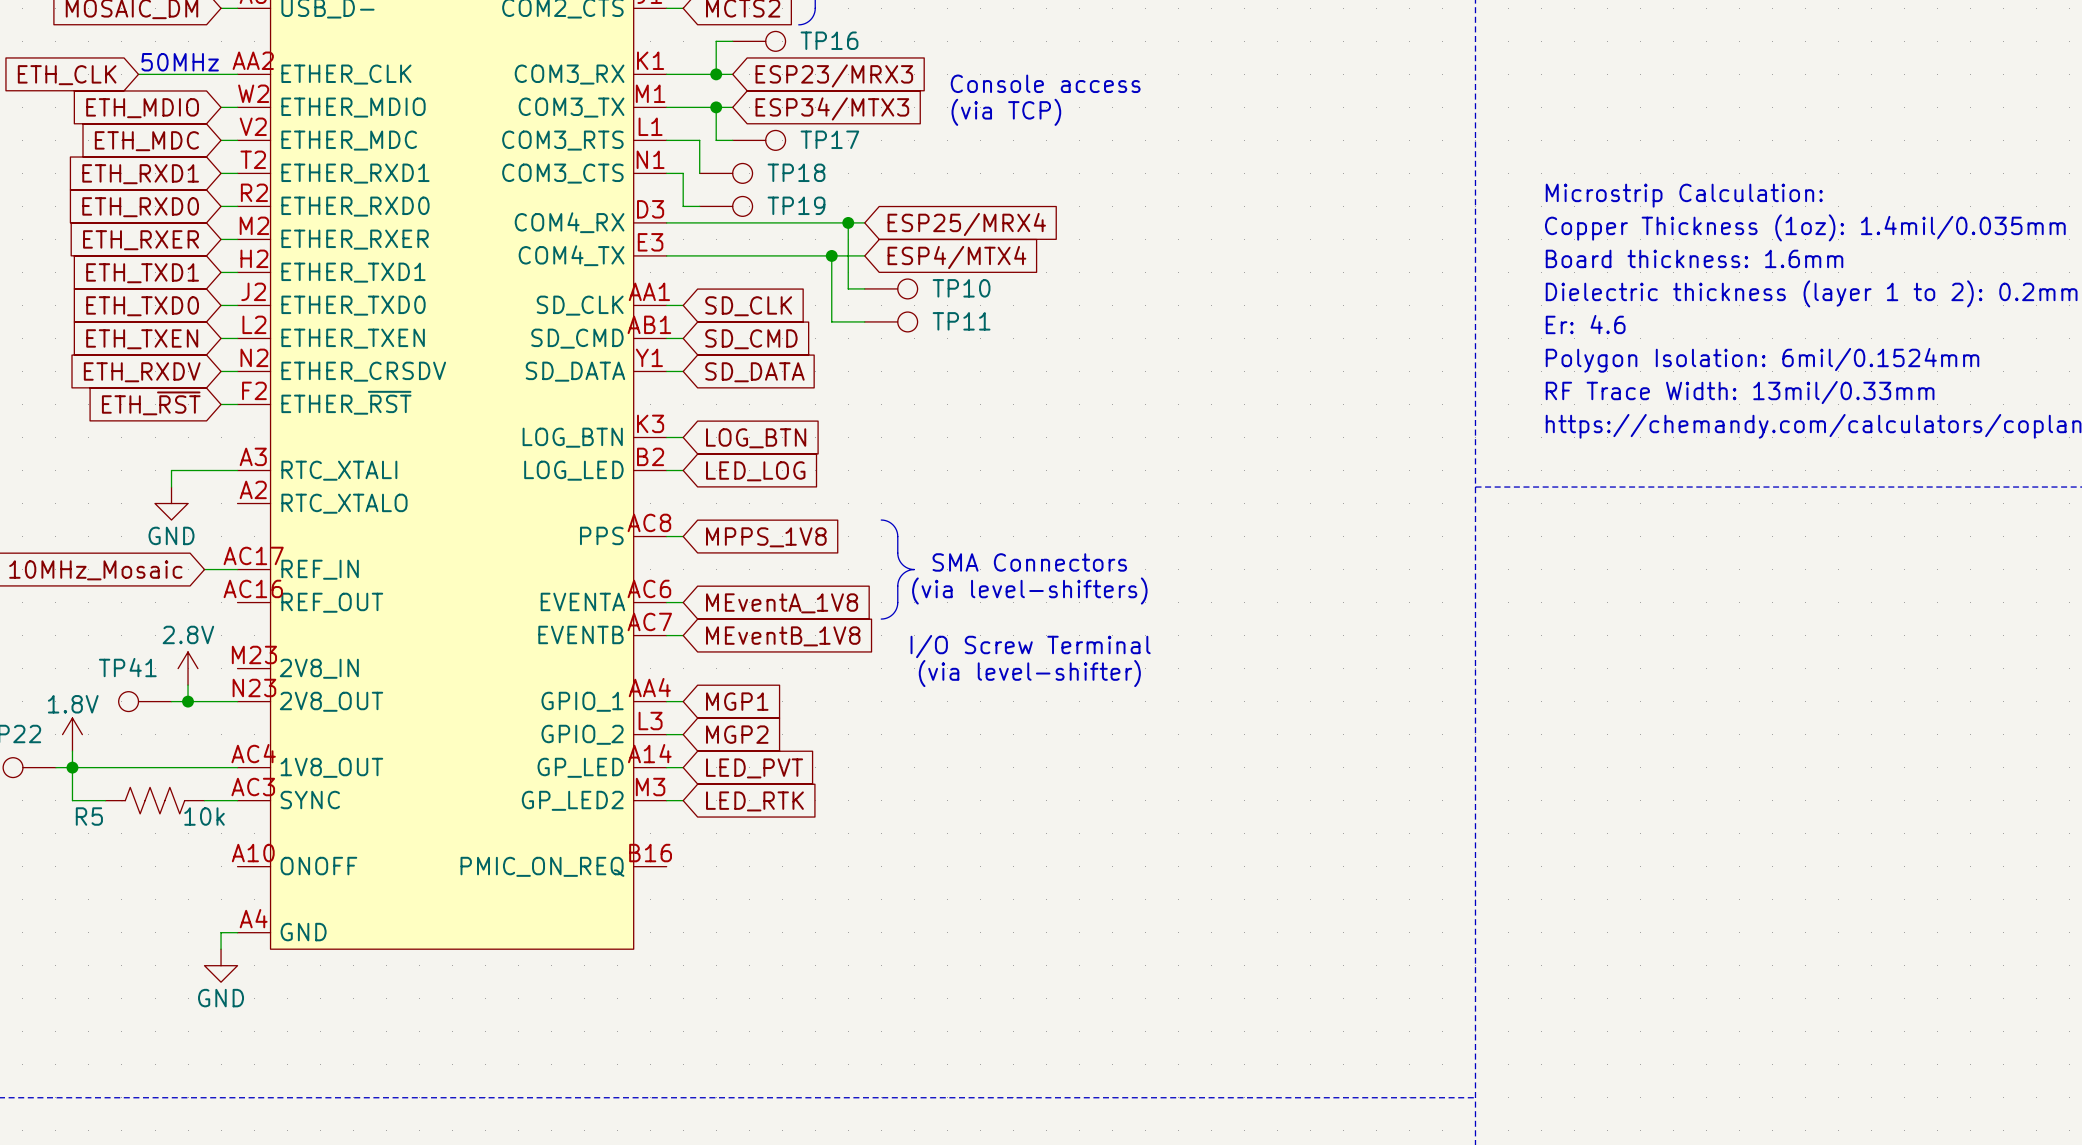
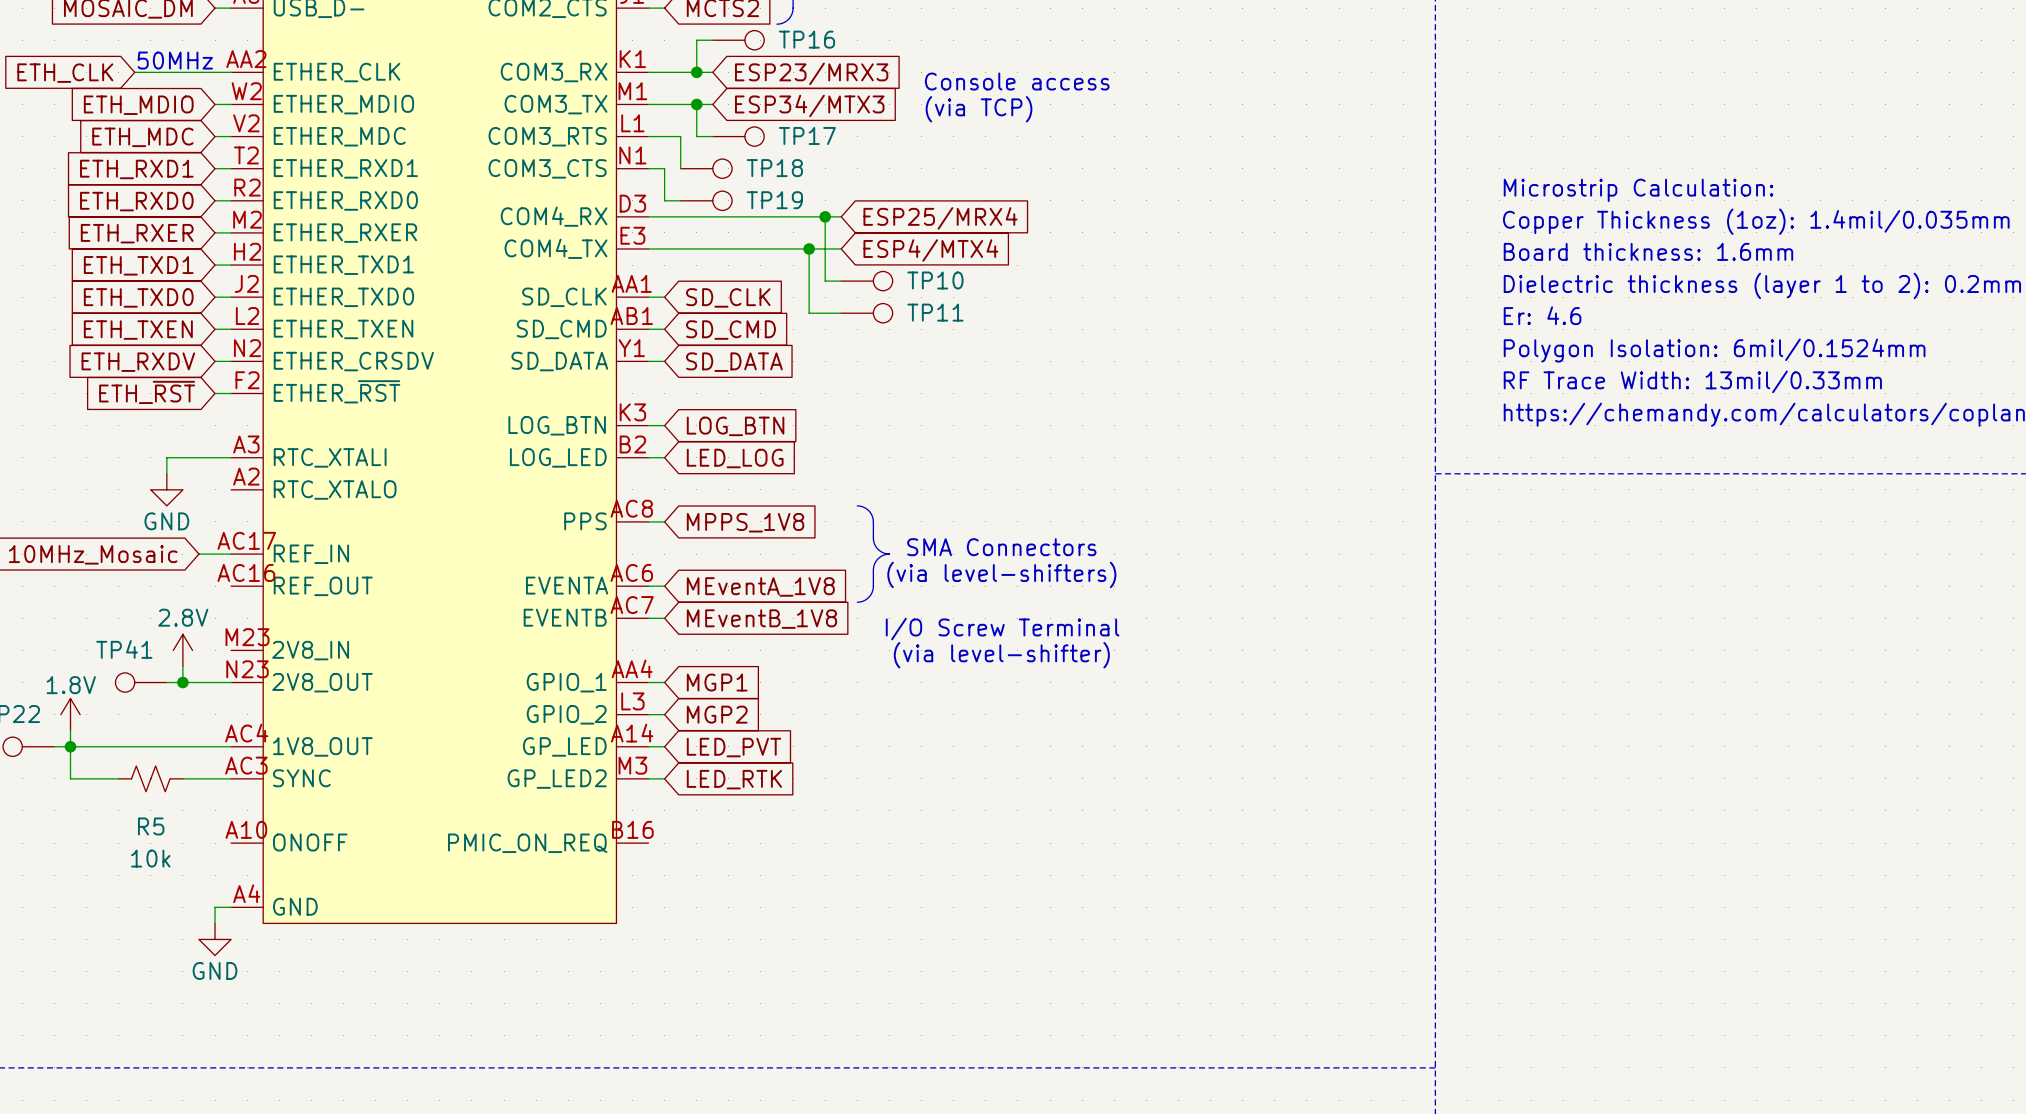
R5 symbol: [105, 787, 205, 814] -> [118, 766, 183, 792]
R5 name position: R5 (89, 816) -> R5 (151, 826)
R5 value position: 10k (204, 816) -> 10k (150, 858)

